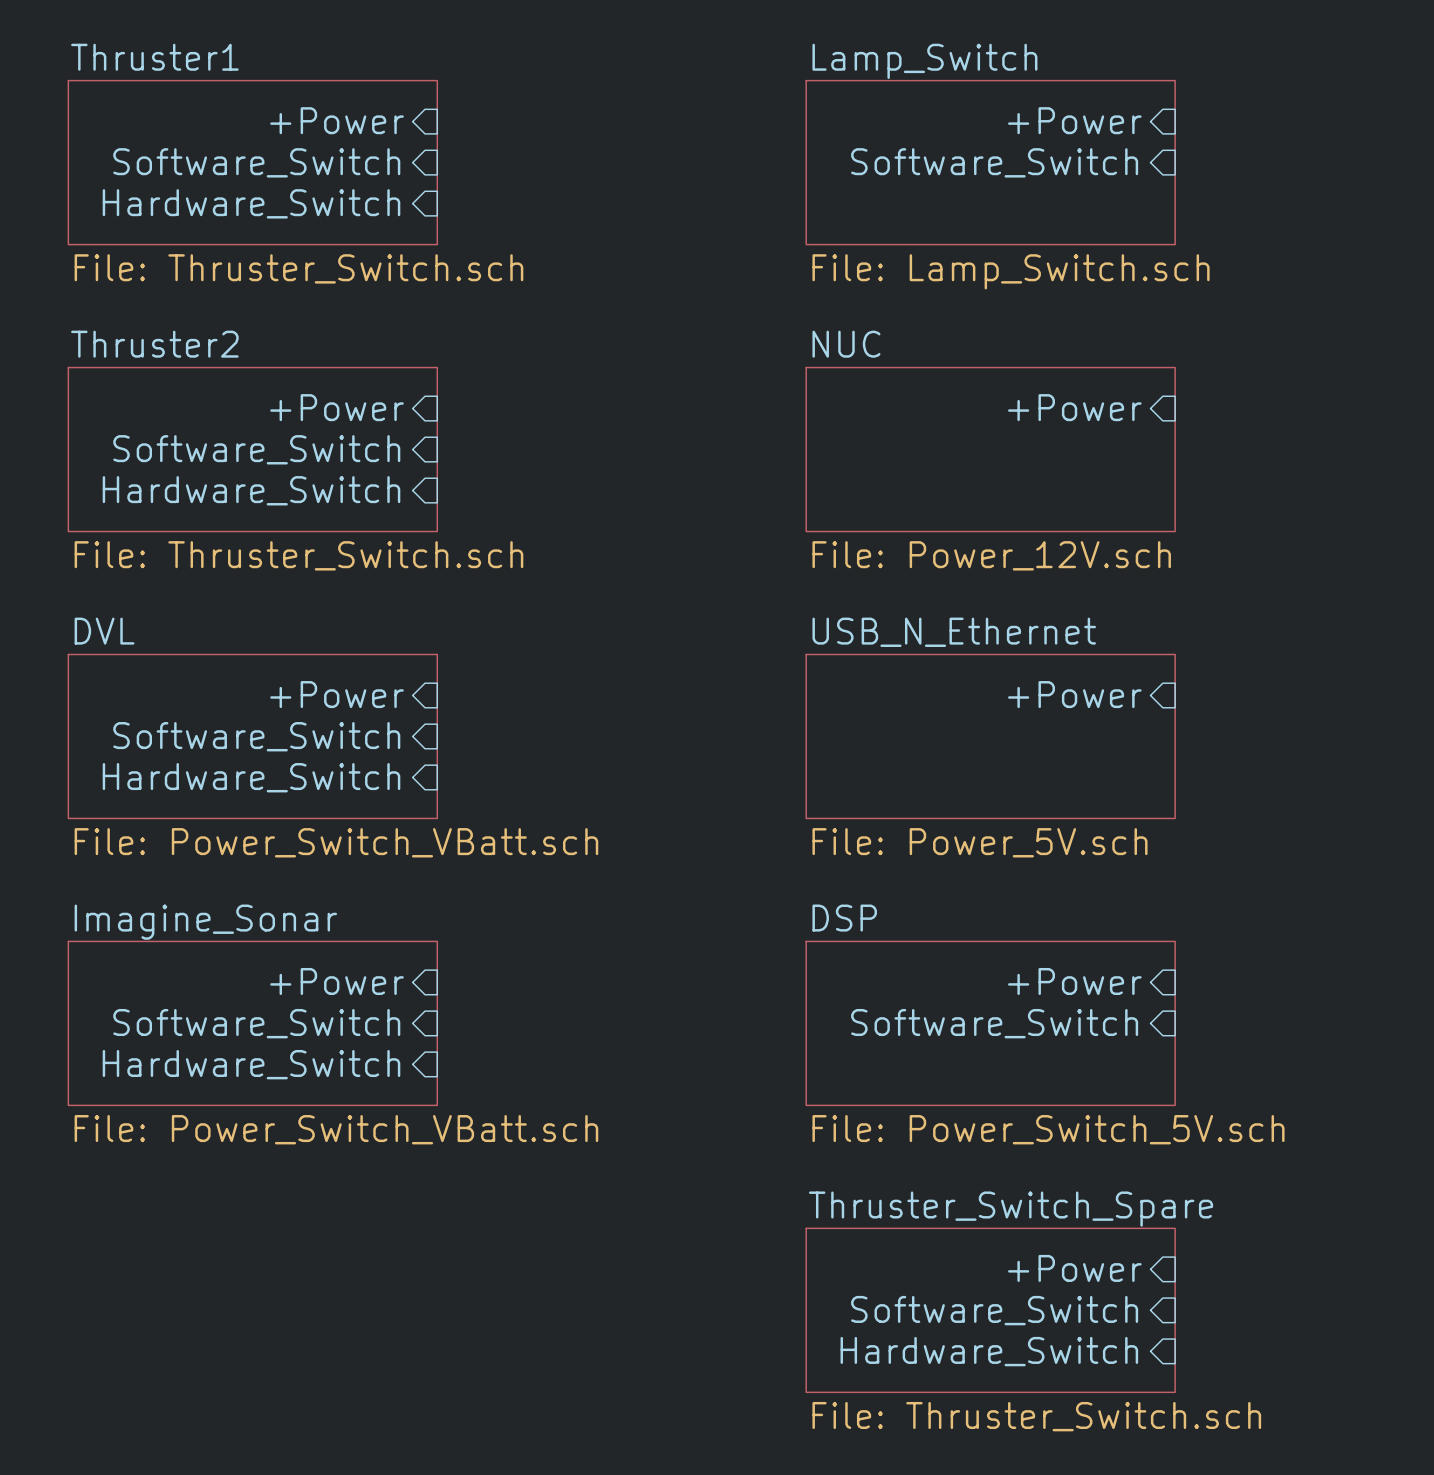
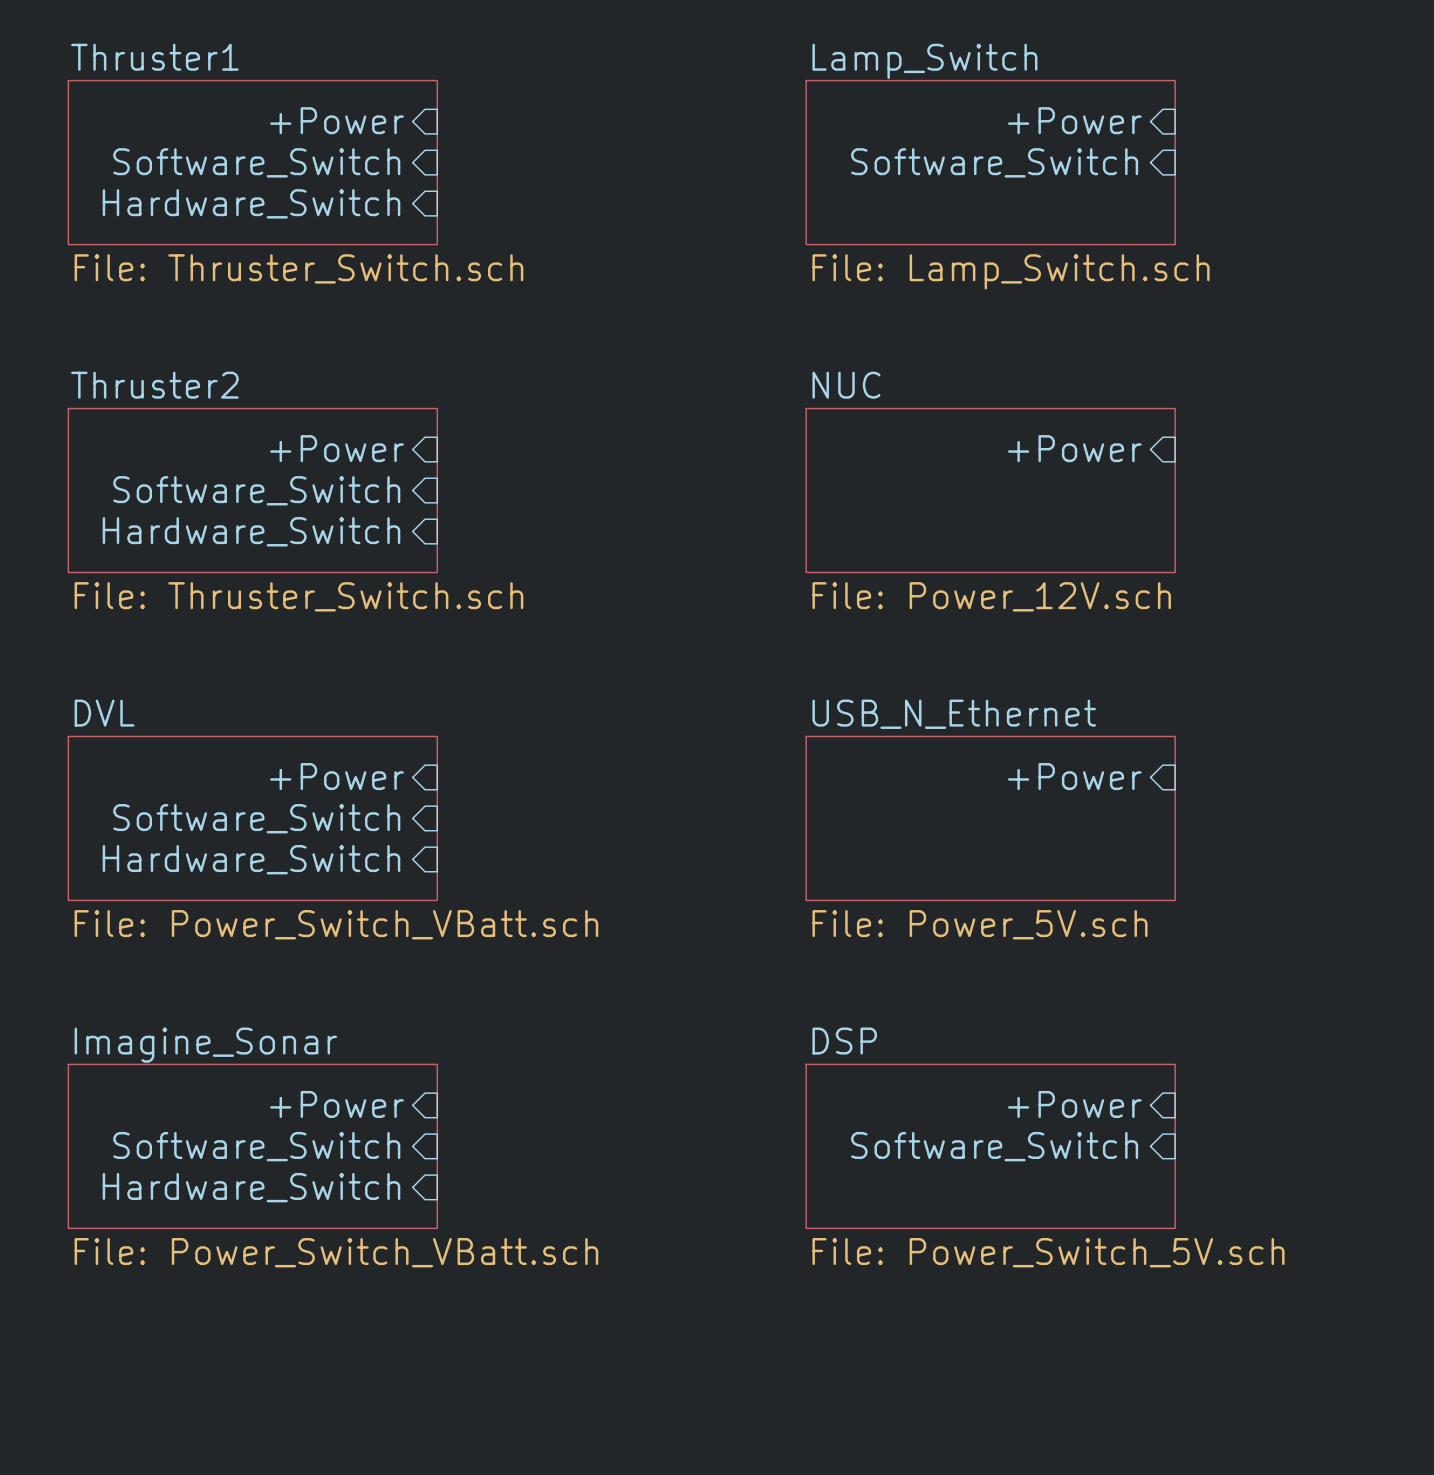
sheet pin: +Power (337, 407) -> none
sheet pin position: +Power (1074, 407) -> +Power (1074, 448)
sheet Thruster2 position: (252, 449) -> (252, 490)
sheet pin: Software_Switch (256, 449) -> +Power (337, 448)
sheet NUC position: (990, 449) -> (990, 490)
sheet pin: Hardware_Switch (251, 490) -> Software_Switch (256, 490)
sheet pin: none -> Hardware_Switch (251, 531)
sheet pin: +Power (337, 694) -> none
sheet pin position: +Power (1074, 694) -> +Power (1074, 776)
sheet DVL position: (252, 736) -> (252, 818)
sheet pin position: Software_Switch (256, 736) -> Software_Switch (256, 818)
sheet USB_N_Ethernet position: (990, 736) -> (990, 818)
sheet pin: Hardware_Switch (251, 777) -> +Power (337, 776)
sheet pin: none -> Hardware_Switch (251, 859)
sheet pin position: +Power (337, 981) -> +Power (337, 1104)
sheet pin: +Power (1074, 981) -> none
sheet Imagine_Sonar position: (252, 1023) -> (252, 1146)
sheet pin: Software_Switch (256, 1023) -> none
sheet DSP position: (990, 1023) -> (990, 1146)
sheet pin: Software_Switch (994, 1023) -> none
sheet pin: Hardware_Switch (251, 1064) -> none
sheet pin: none -> +Power (1074, 1104)
sheet pin: none -> Software_Switch (256, 1146)
sheet pin: none -> Software_Switch (994, 1146)
sheet pin: none -> Hardware_Switch (251, 1187)
sheet pin: +Power (1074, 1268) -> none
sheet Thruster_Switch_Spare: File: Thruster_Switch.sch (990, 1310) -> none
sheet pin: Software_Switch (994, 1310) -> none
sheet pin: Hardware_Switch (989, 1351) -> none

